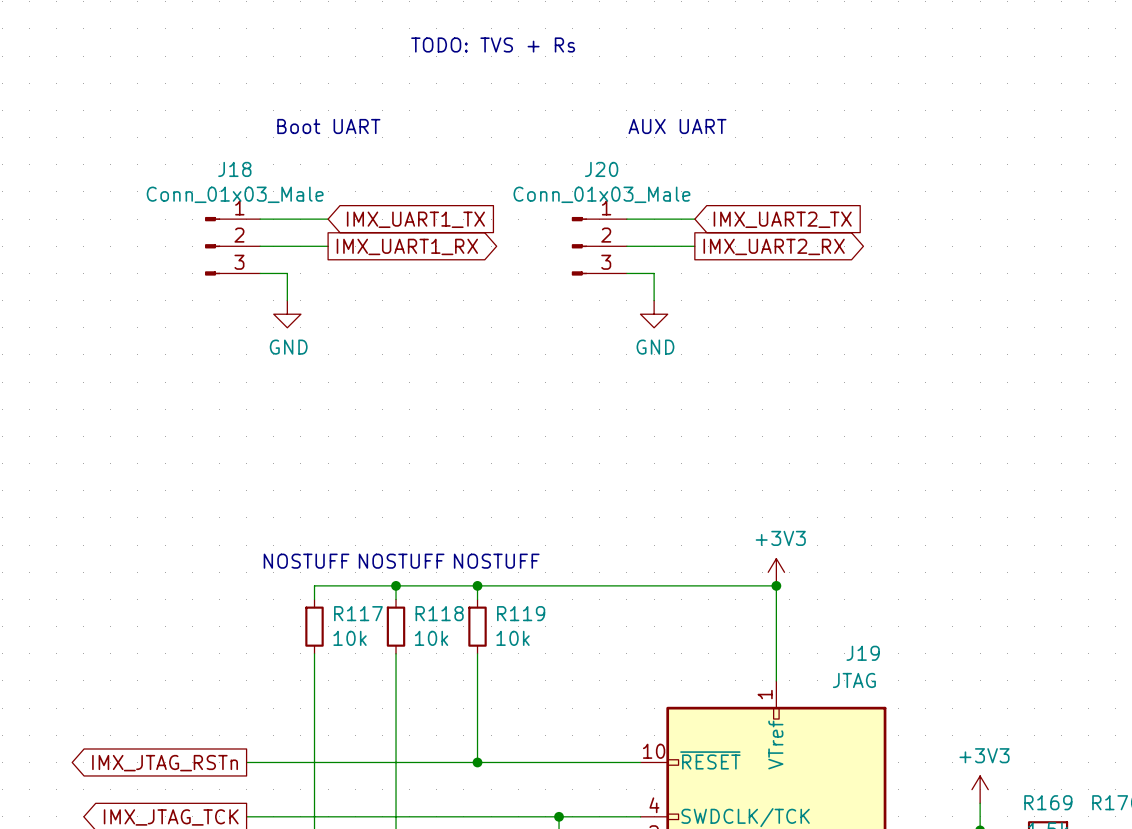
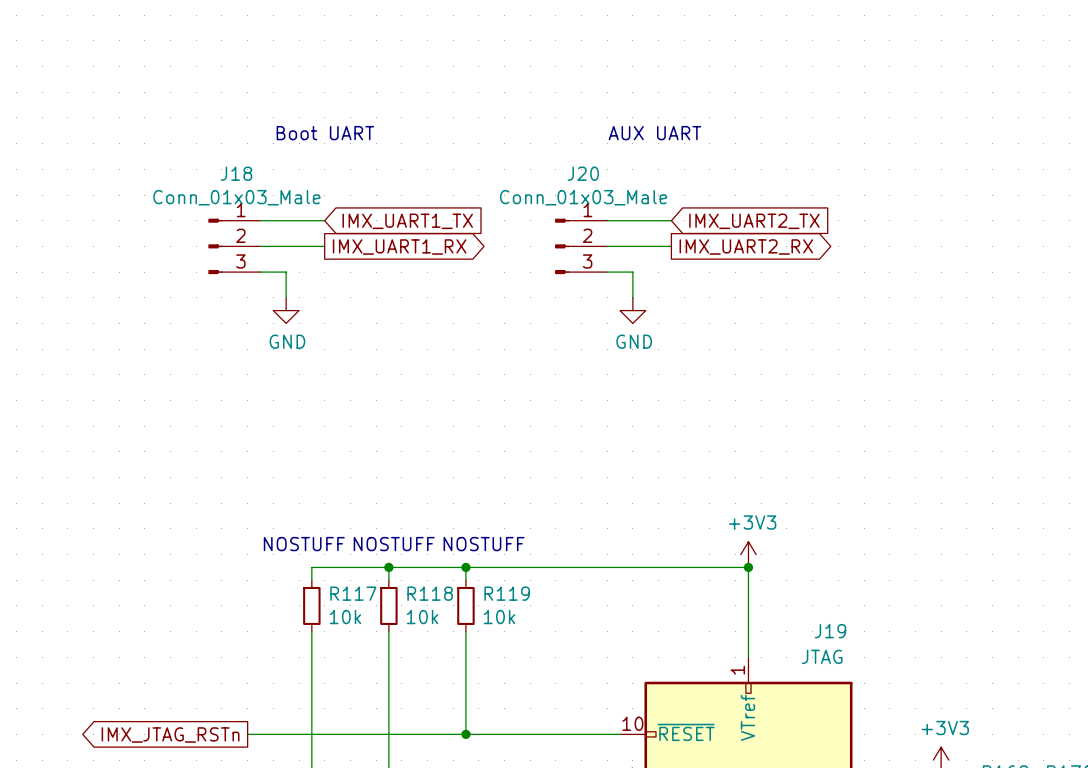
text: TODO: TVS + Rs (493, 44) -> none

